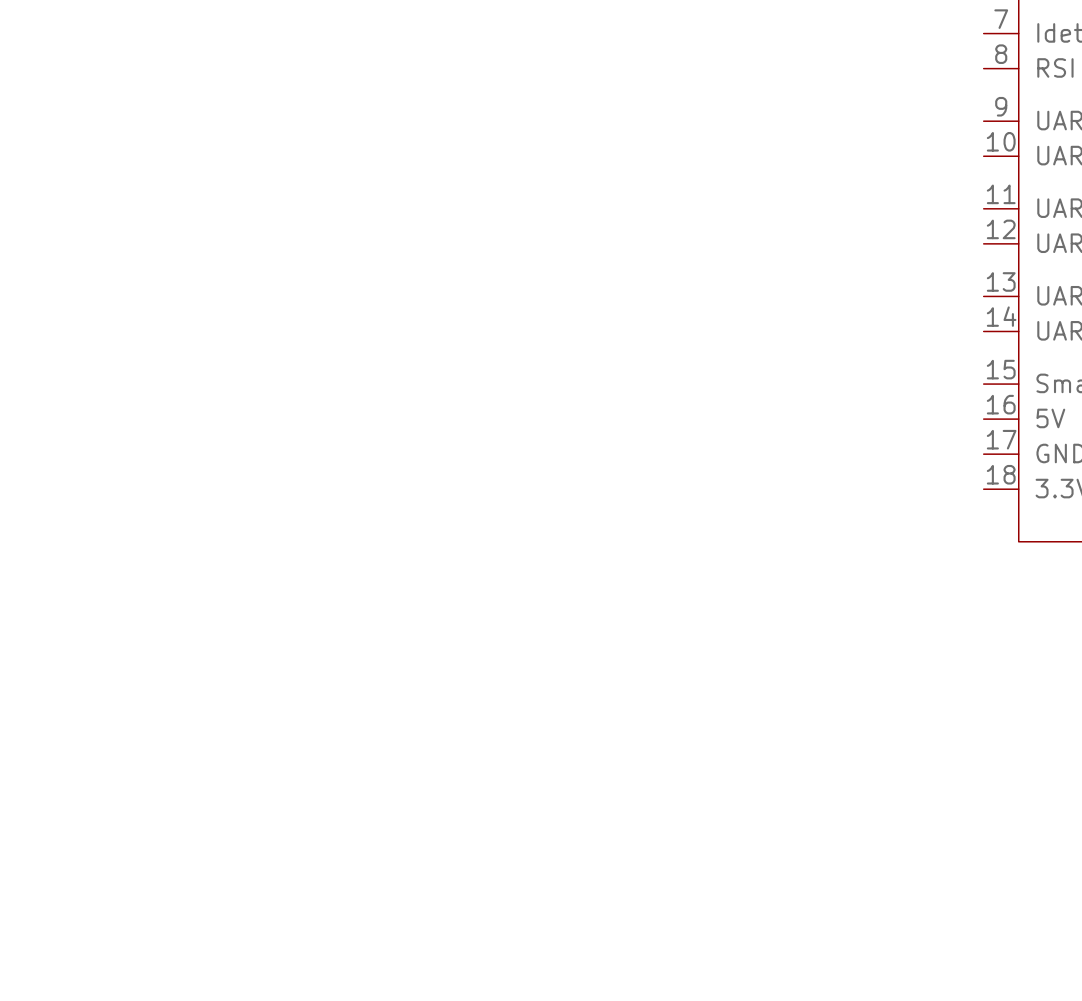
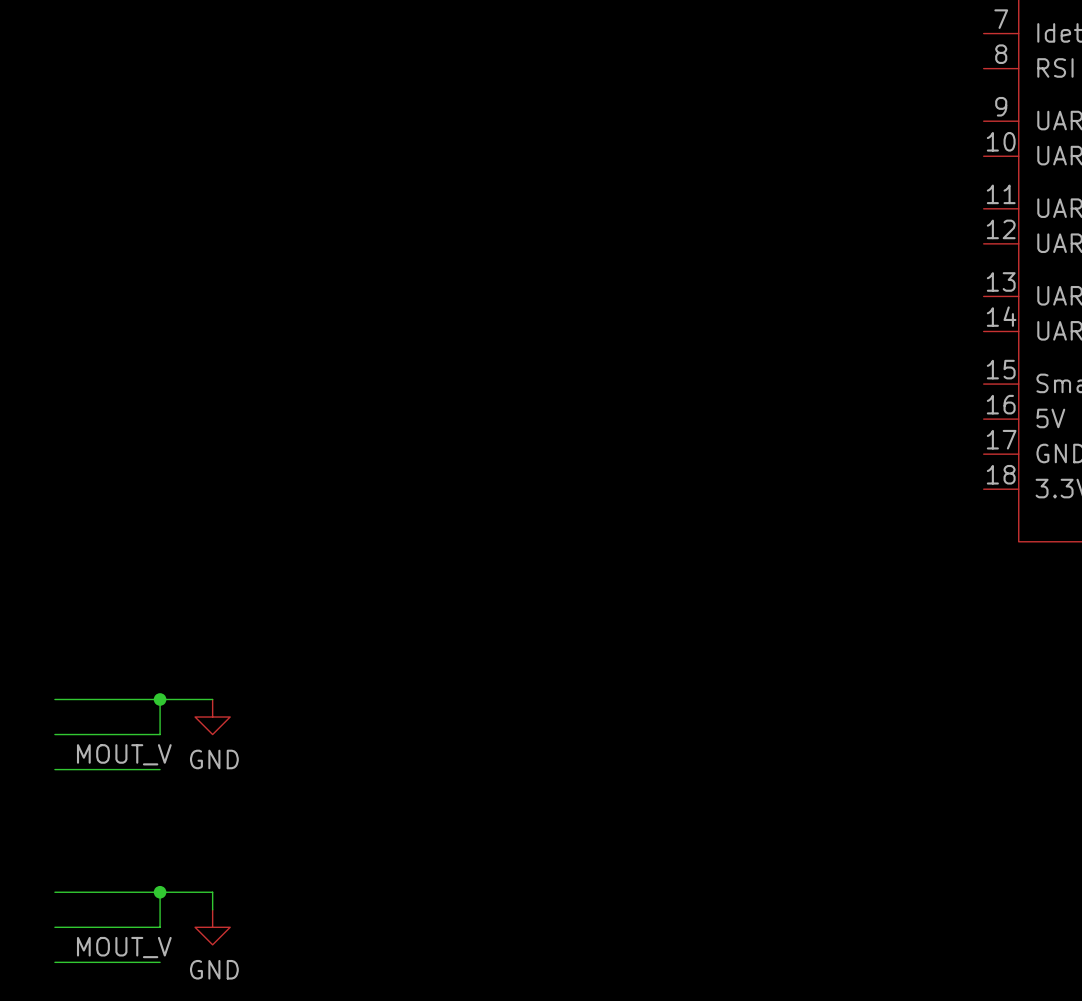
wire: none -> (54, 699) (212, 699)
wire: none -> (160, 699) (160, 734) (54, 734)
junction: none -> (160, 699)
power symbol: none -> GND (212, 717)
label: none -> MOUT_V (124, 754)
wire: none -> (54, 769) (160, 769)
wire: none -> (54, 892) (212, 892) (212, 909)
wire: none -> (160, 892) (160, 927) (54, 927)
junction: none -> (160, 892)
power symbol: none -> GND (212, 927)
label: none -> MOUT_V (124, 947)
wire: none -> (54, 962) (160, 962)

